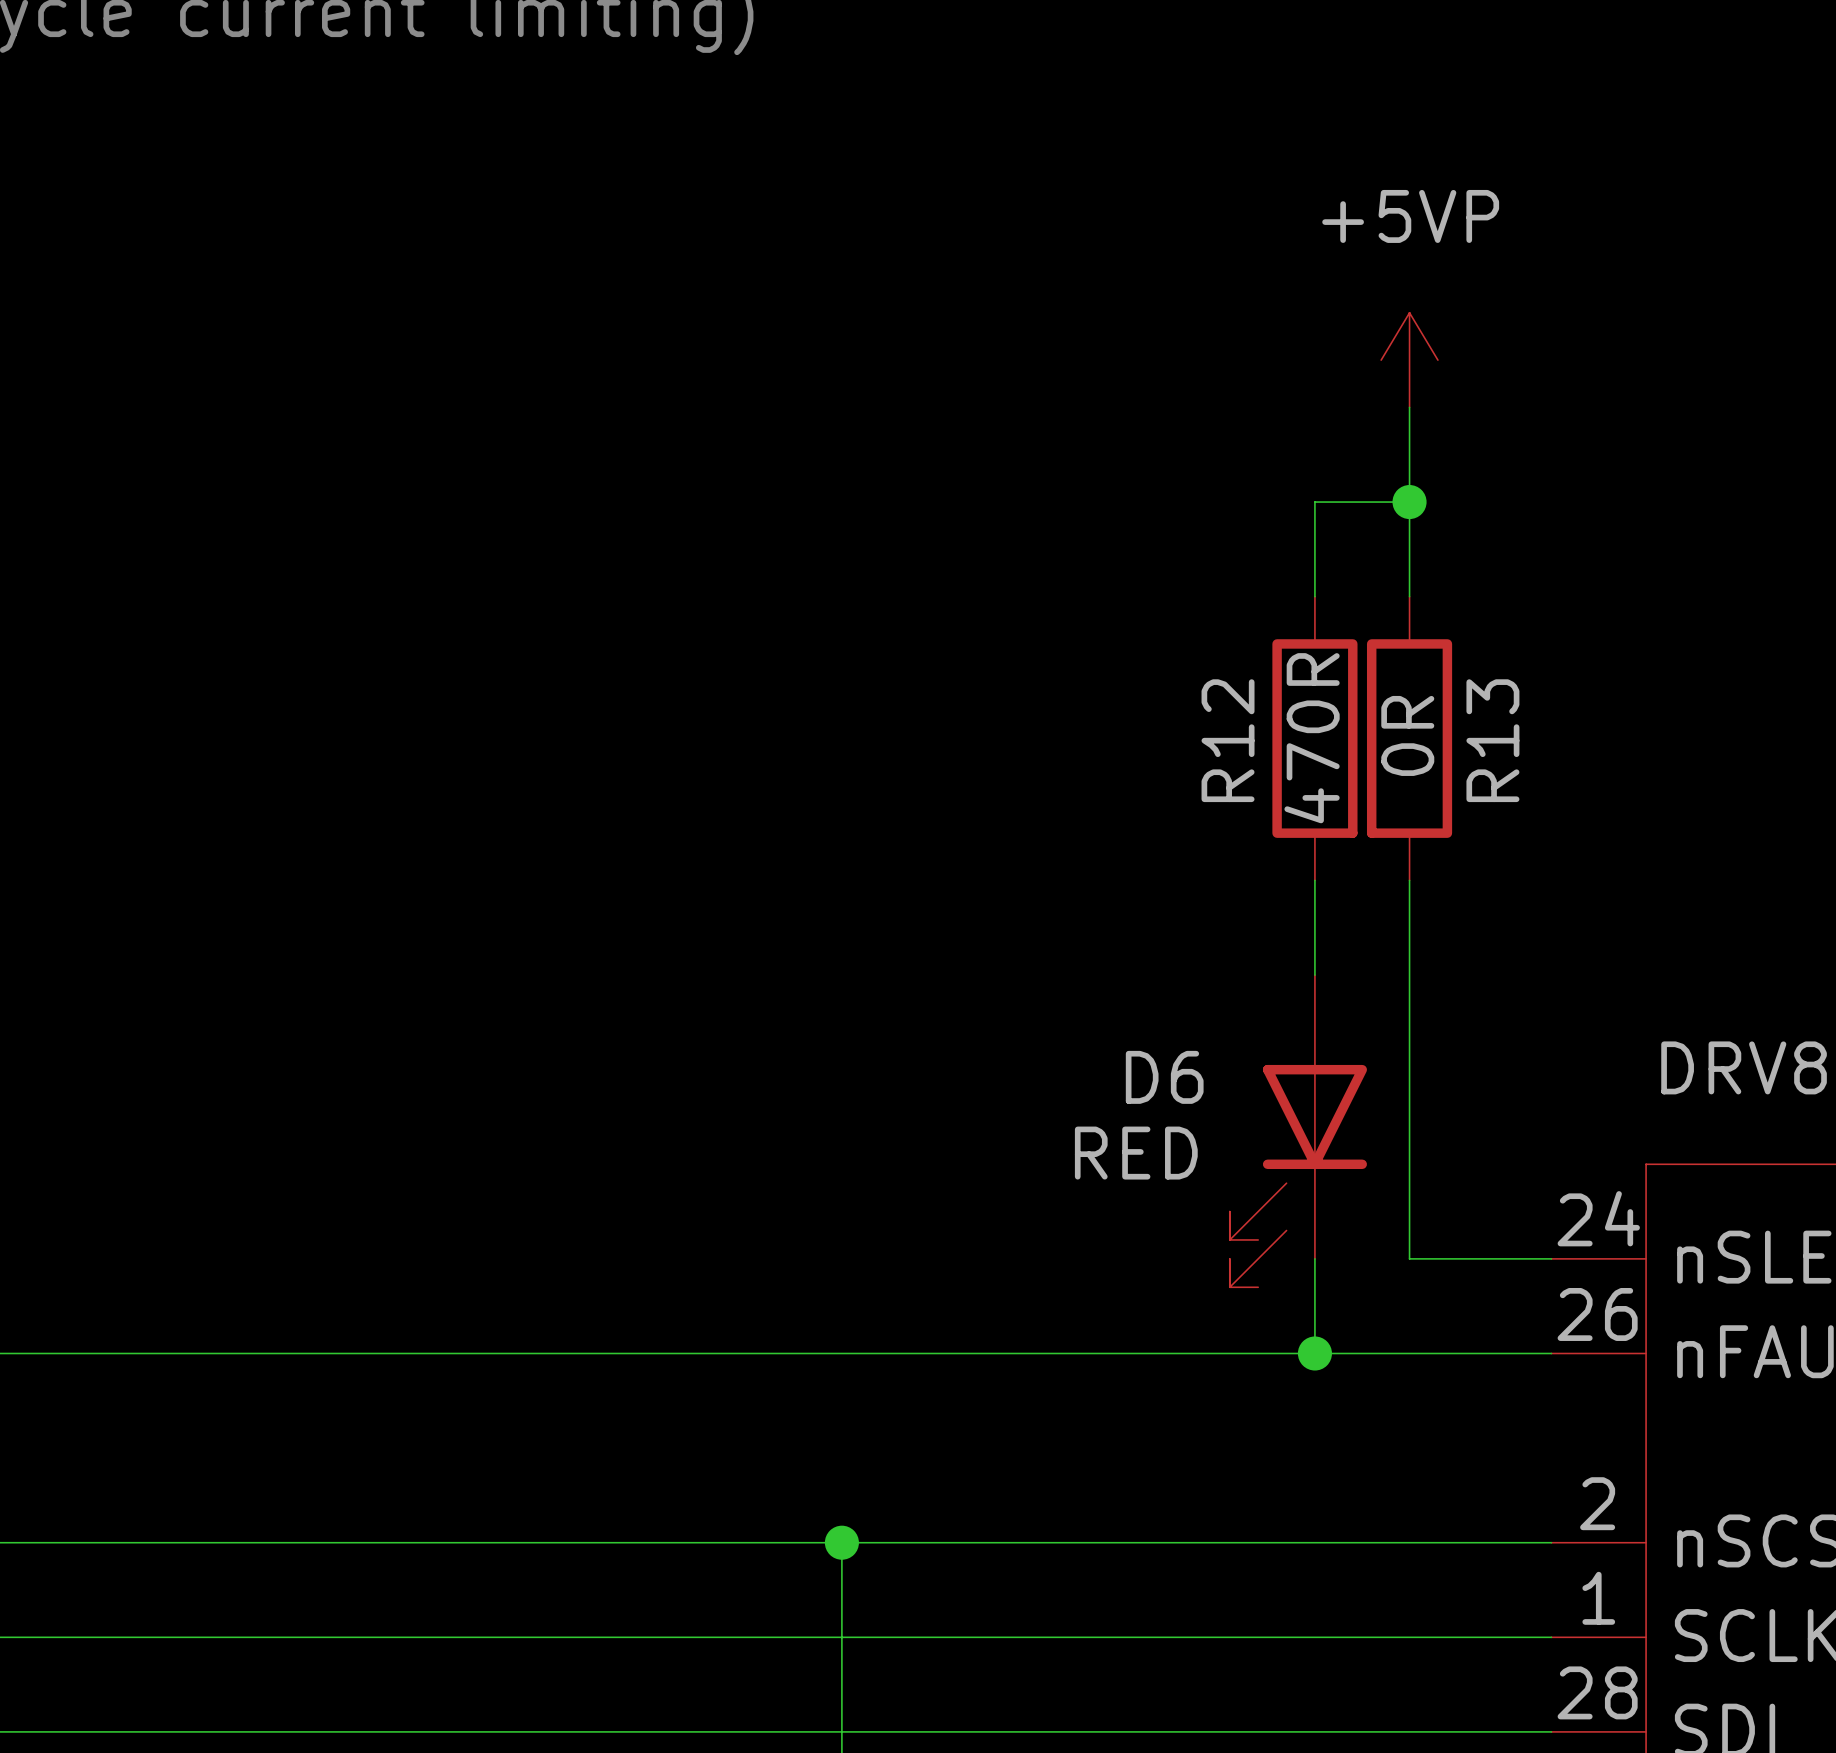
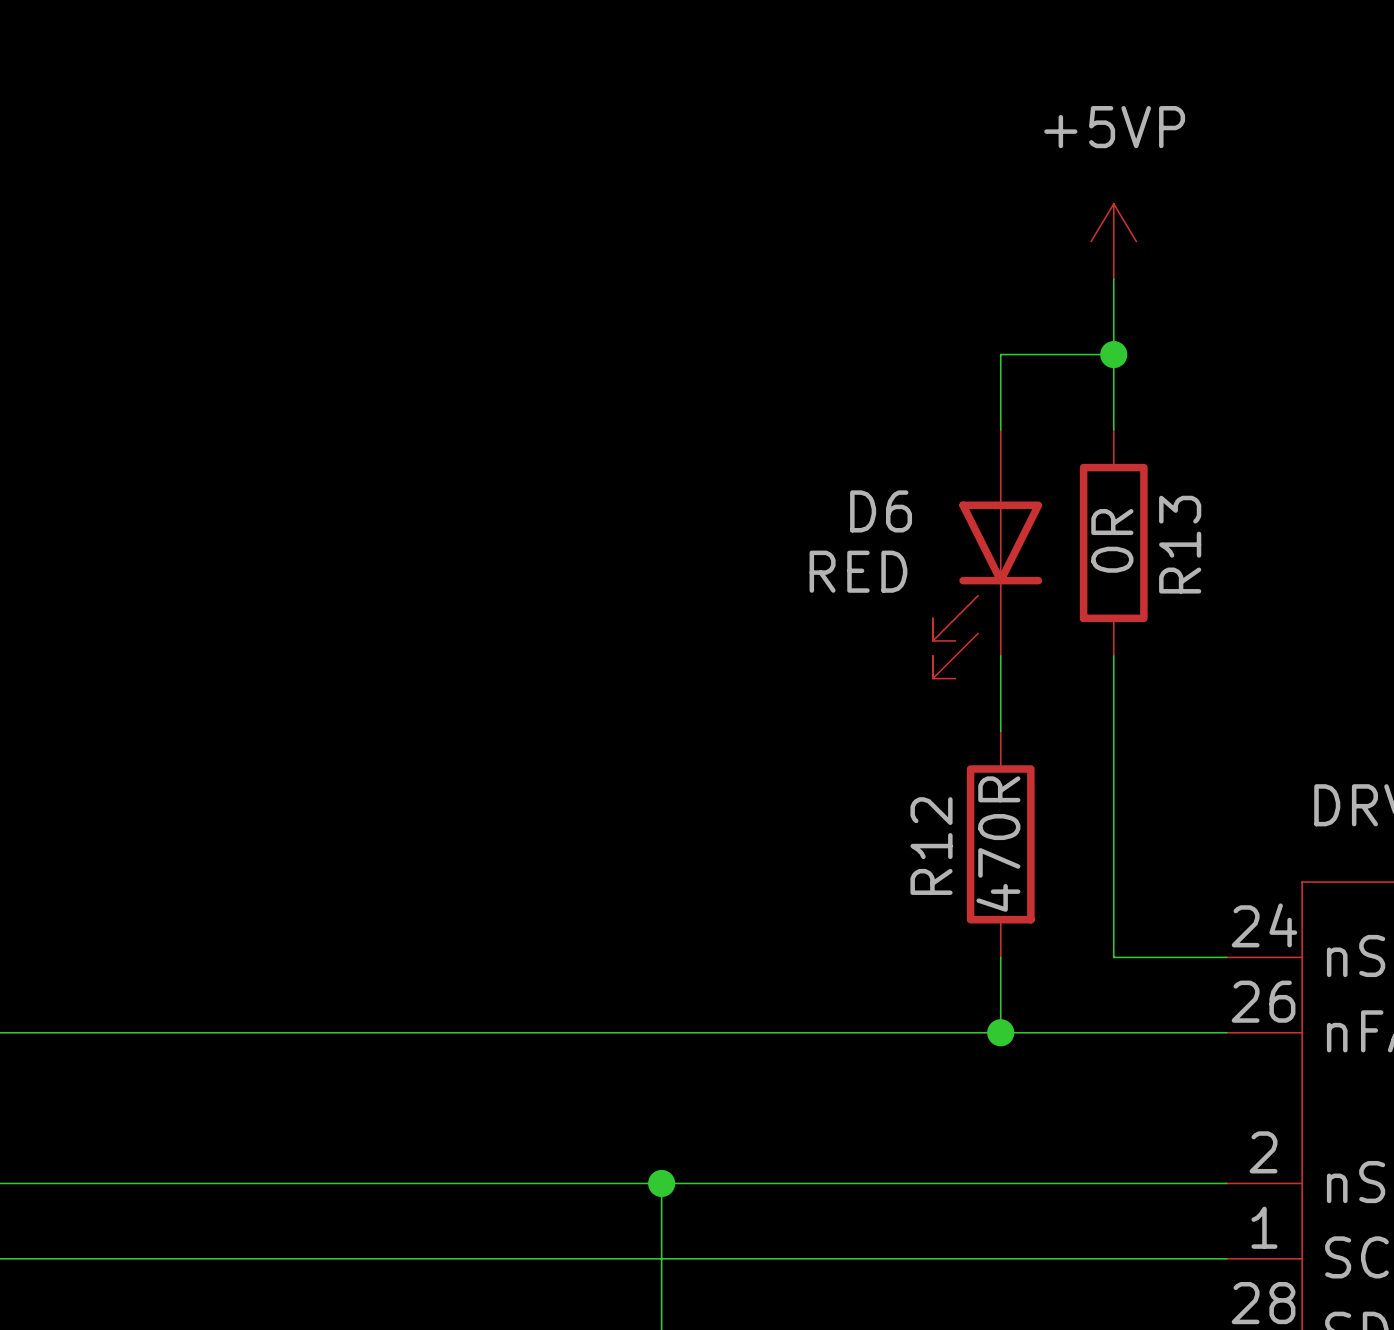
wire: (1314, 502) (1314, 596) -> (1038, 354) (1000, 354) (1000, 429)
R12 position: (1314, 738) -> (1000, 844)
wire: (1314, 880) (1314, 975) -> (1000, 655) (1000, 731)
D6 position: (1298, 1131) -> (987, 554)
wire: (1314, 1258) (1314, 1353) -> (1000, 957) (1000, 1032)
junction position: (1314, 1353) -> (1000, 1032)

